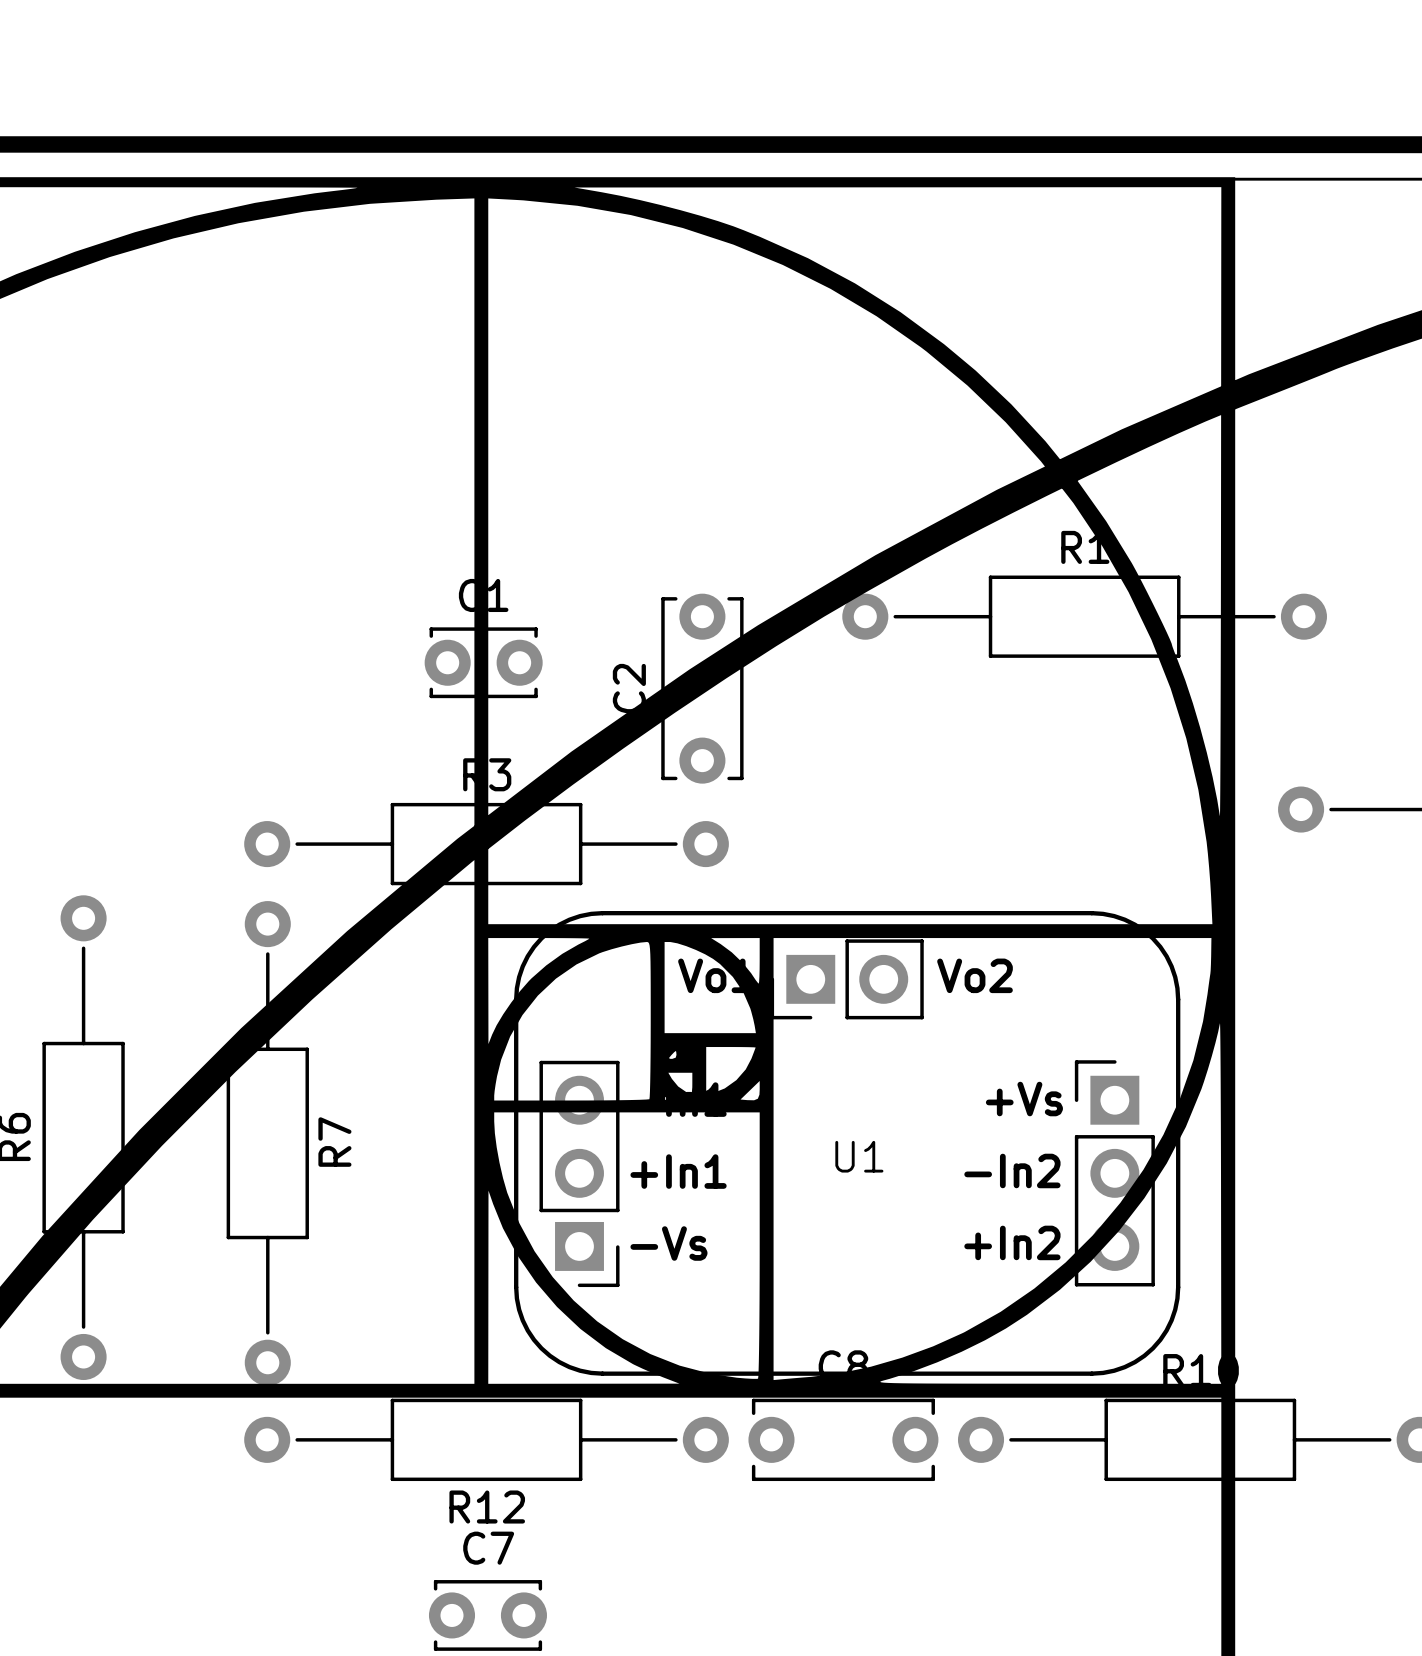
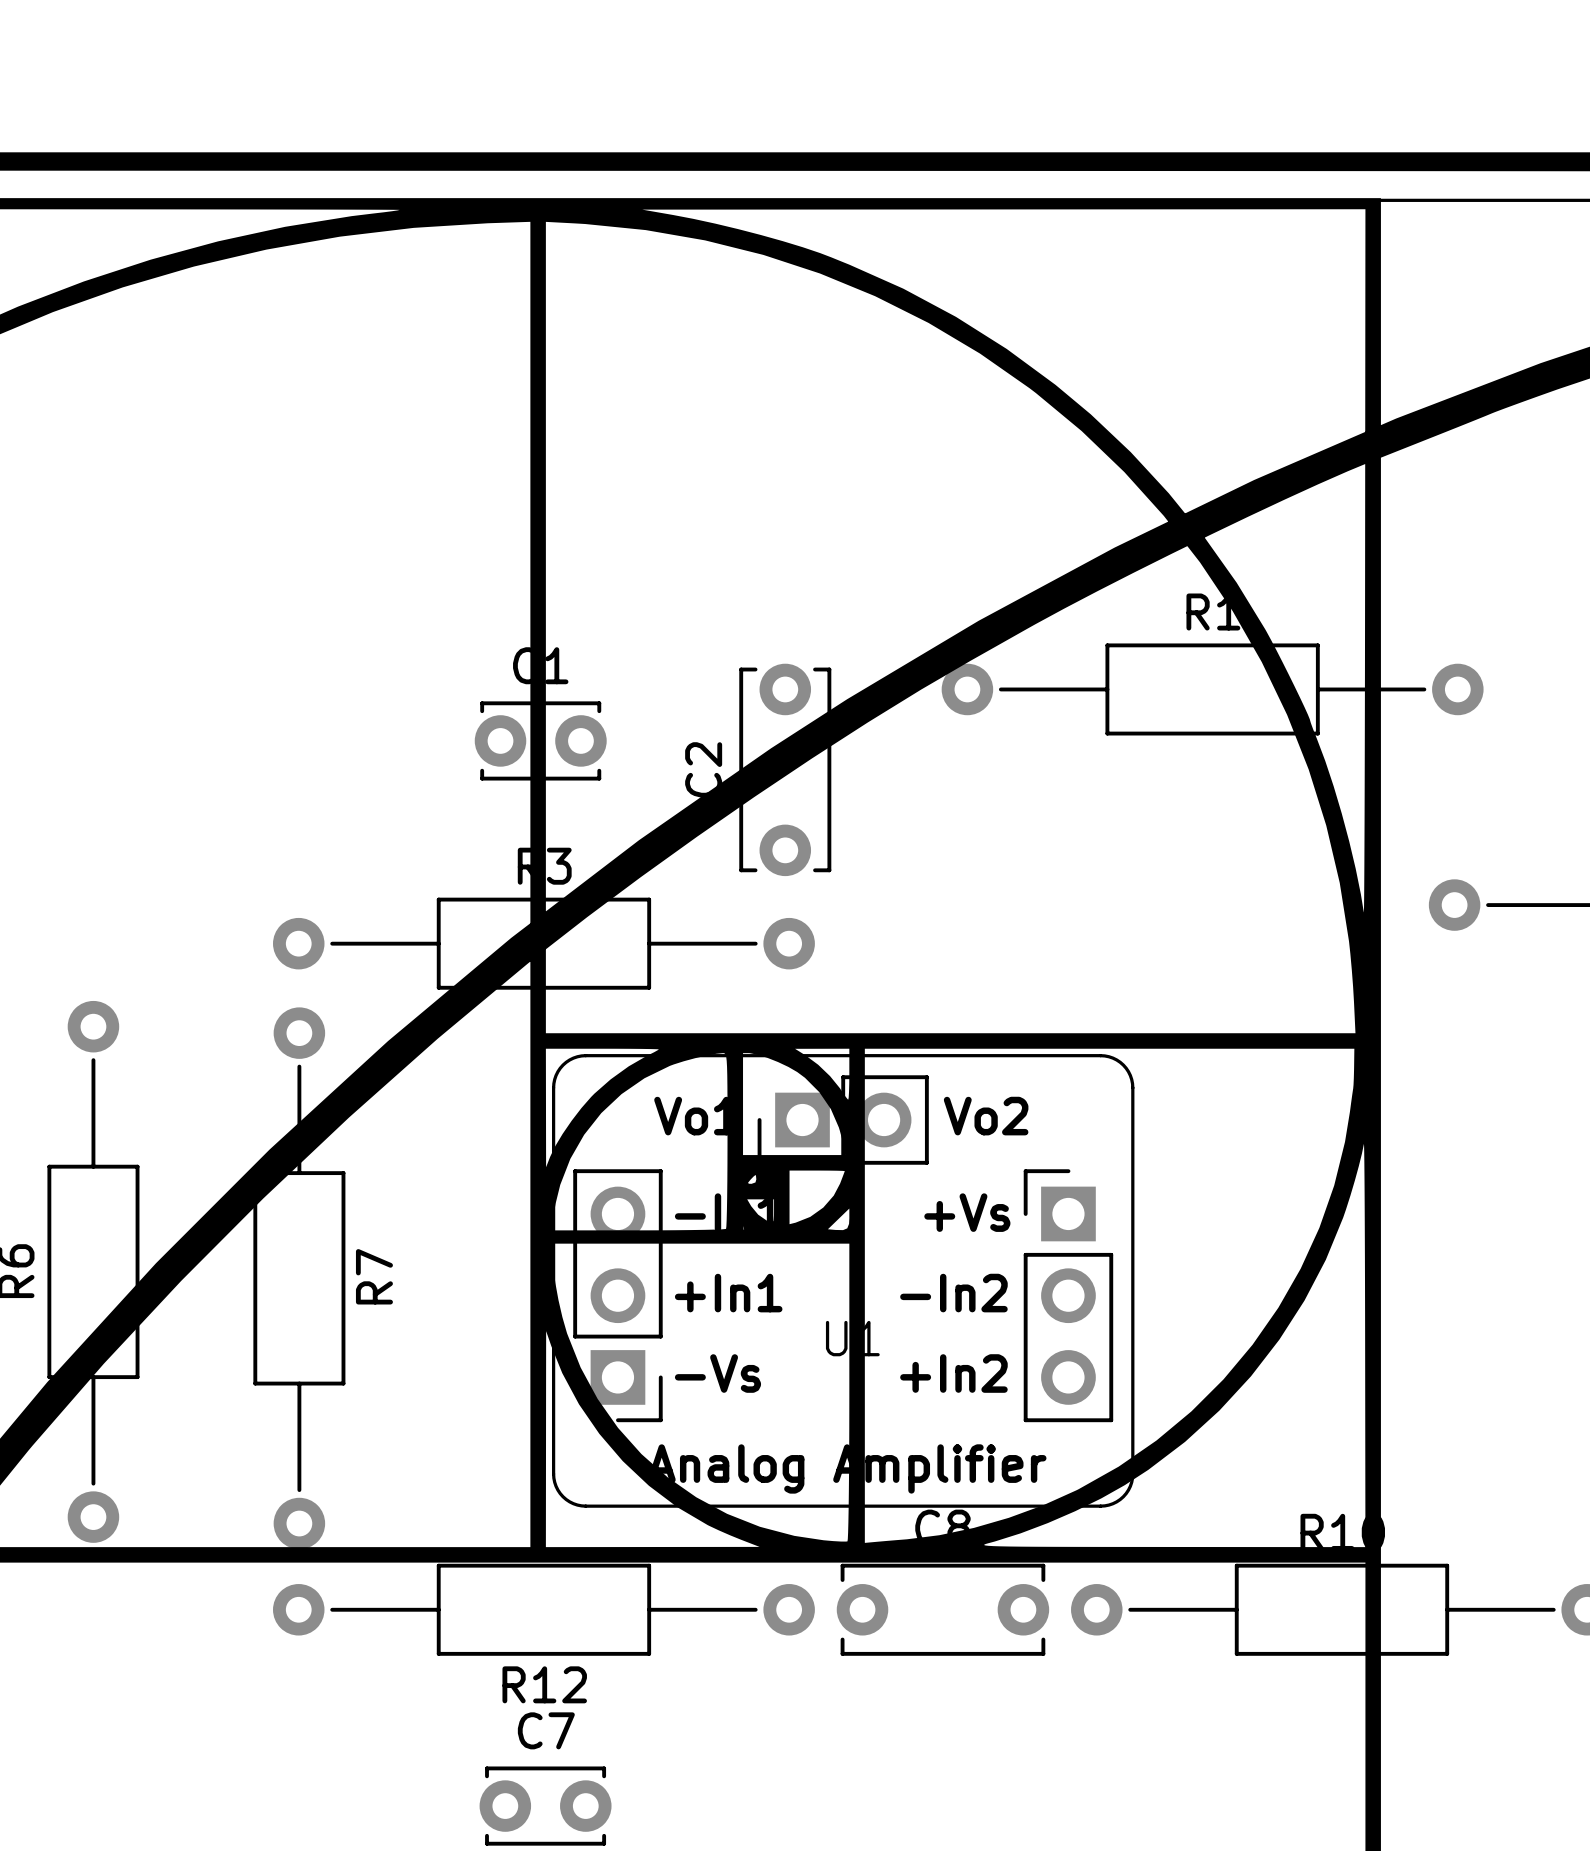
U1 footprint: [514, 910, 1181, 1376] -> [551, 1054, 1135, 1508]

